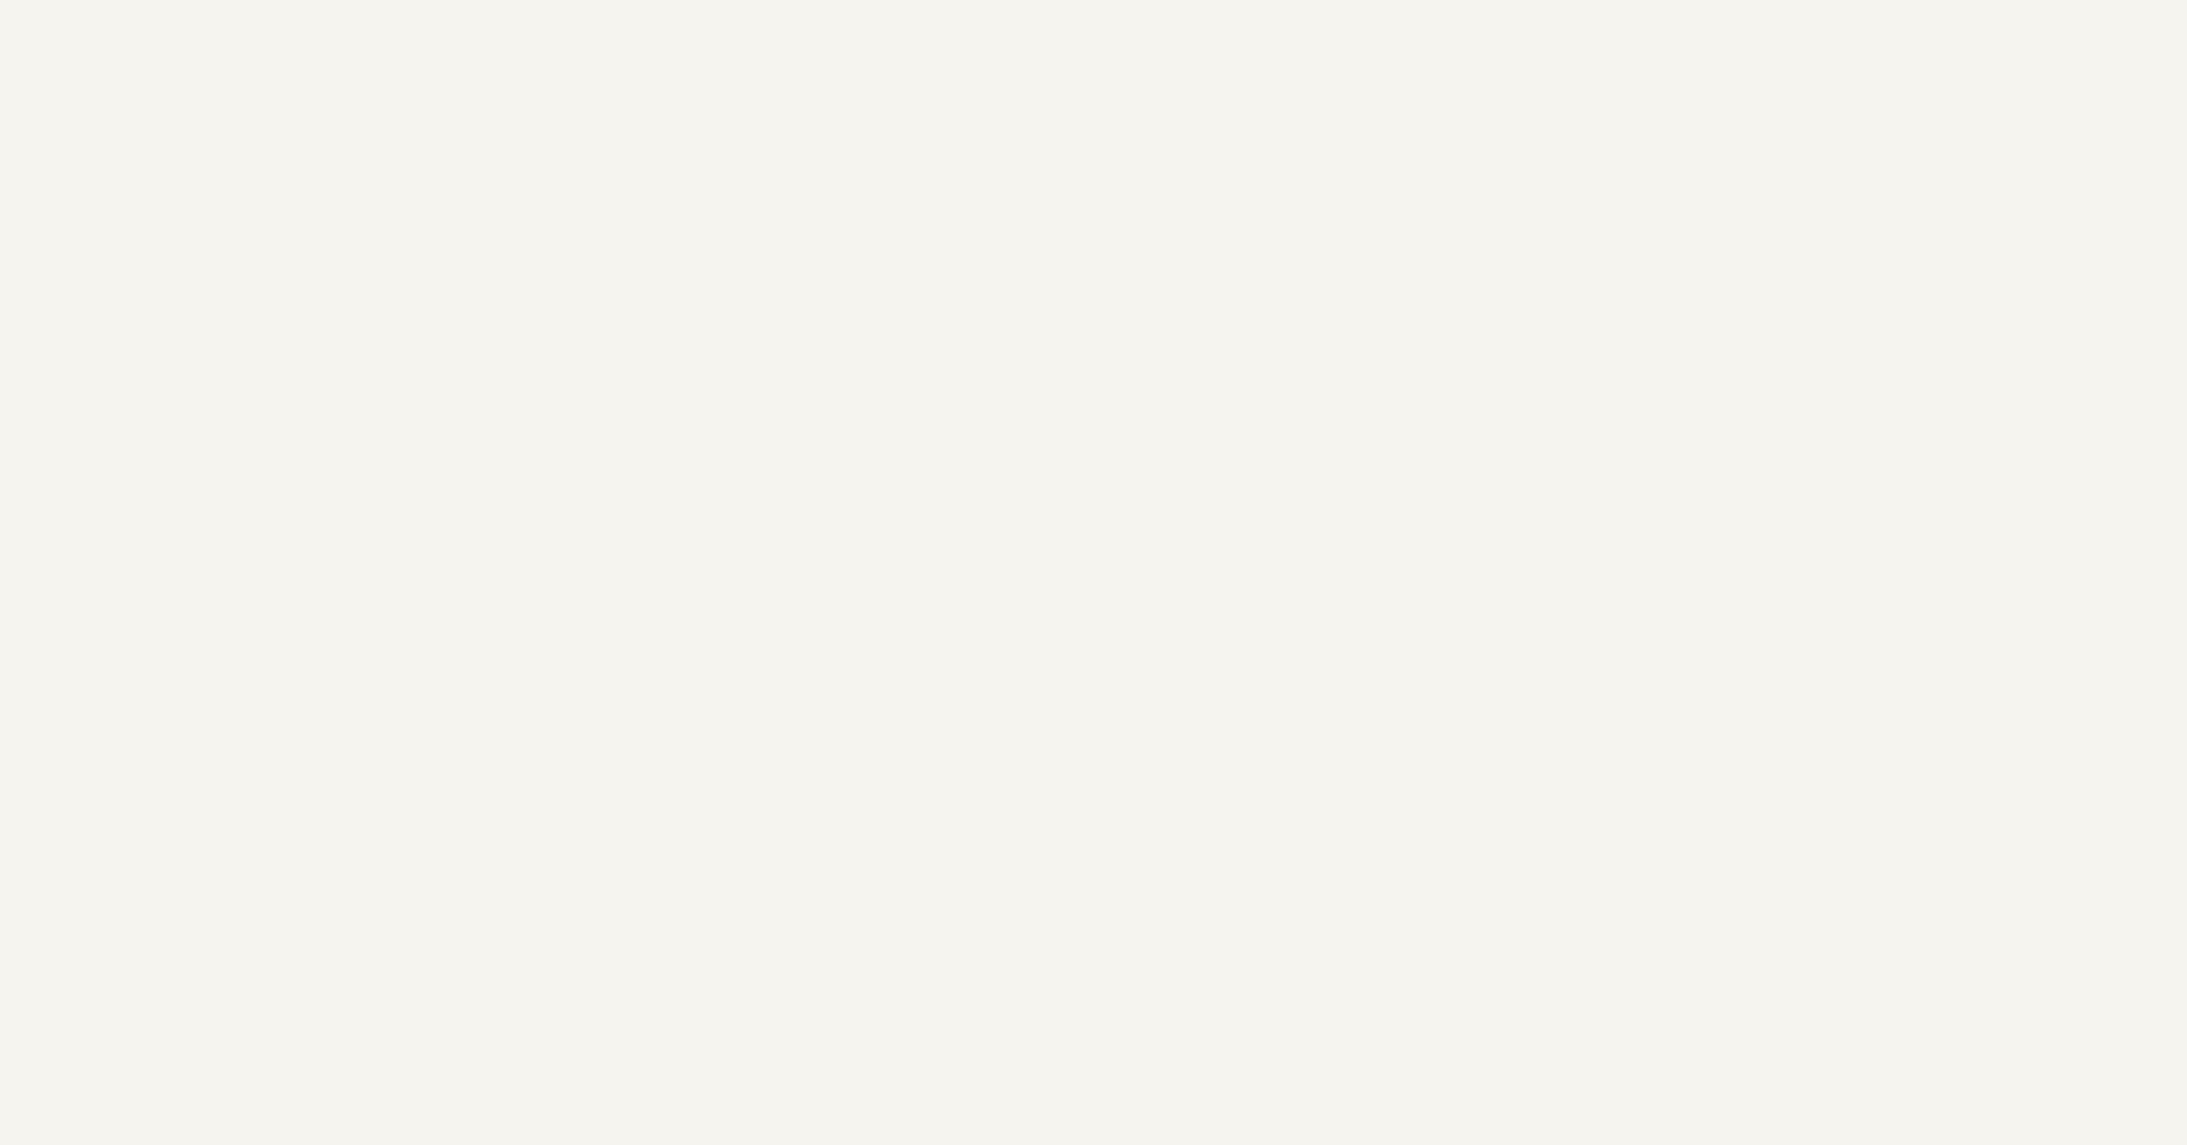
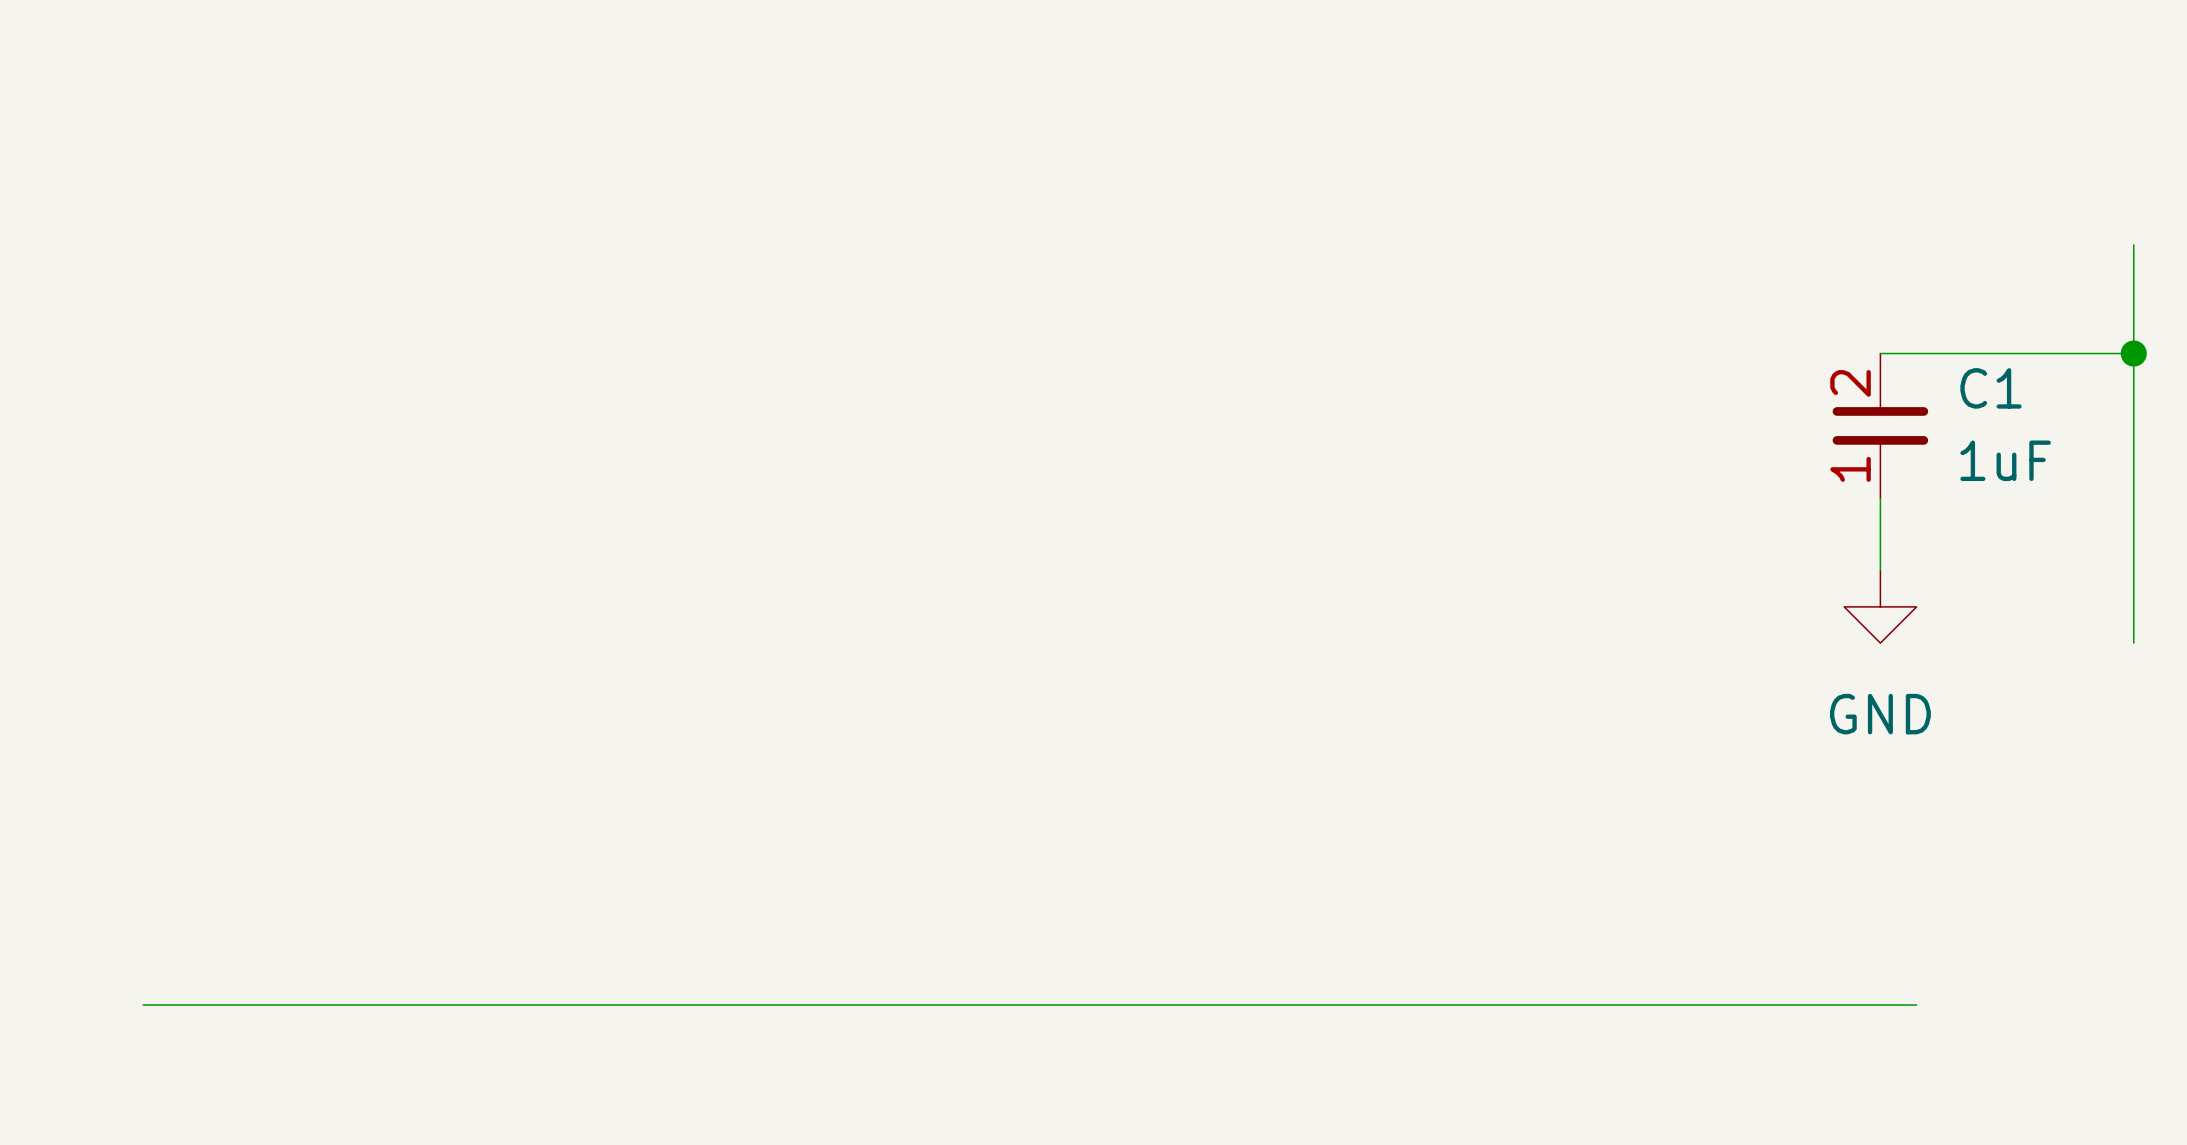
wire: none -> (2133, 244) (2133, 643)
wire: none -> (1880, 353) (2133, 353)
junction: none -> (2133, 353)
C1: none -> 1uF (1880, 425)
wire: none -> (1880, 498) (1880, 570)
power symbol: none -> GND (1880, 606)
wire: none -> (143, 1005) (1916, 1005)

